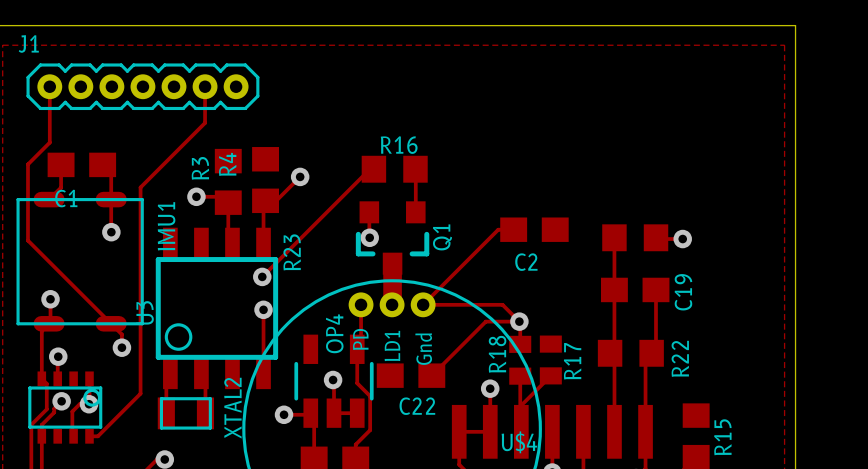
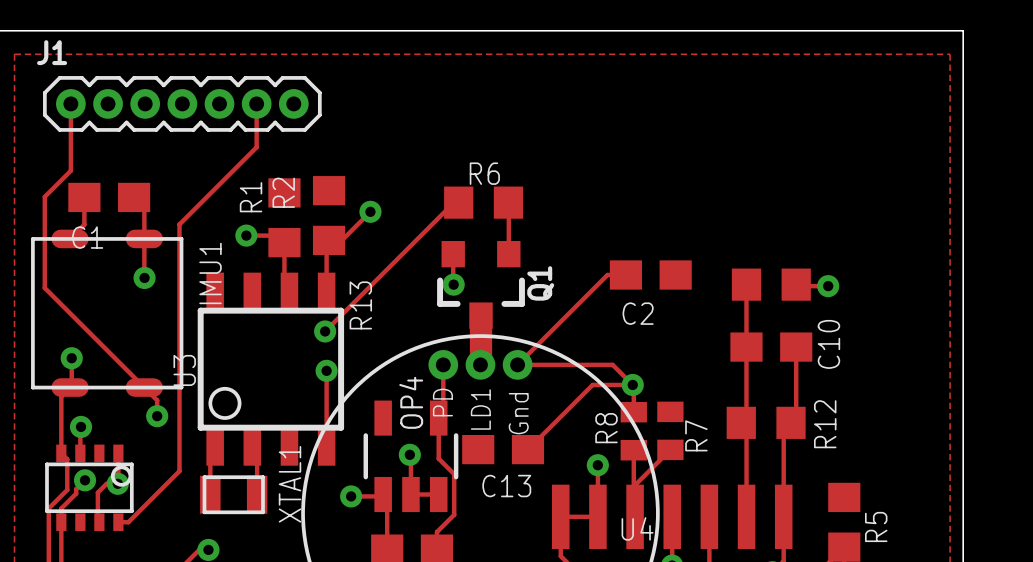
R16 name: R16 (399, 145) -> R6 (484, 173)
R4 name: R4 (227, 164) -> R2 (283, 192)
R3 name: R3 (200, 168) -> R1 (251, 197)
R23 name: R23 (292, 252) -> R13 (360, 305)
C19 name: C19 (683, 292) -> C10 (828, 344)
R18 name: R18 (497, 354) -> R8 (606, 428)
R22 name: R22 (680, 358) -> R12 (825, 424)
R17 name: R17 (572, 361) -> R7 (696, 435)
C22 name: C22 (417, 406) -> C13 (506, 486)
XTAL2 name: XTAL2 (232, 408) -> XTAL1 (290, 484)
R15 name: R15 (722, 437) -> R5 (876, 526)
U$4 name: U$4 (519, 442) -> U4 (637, 528)

